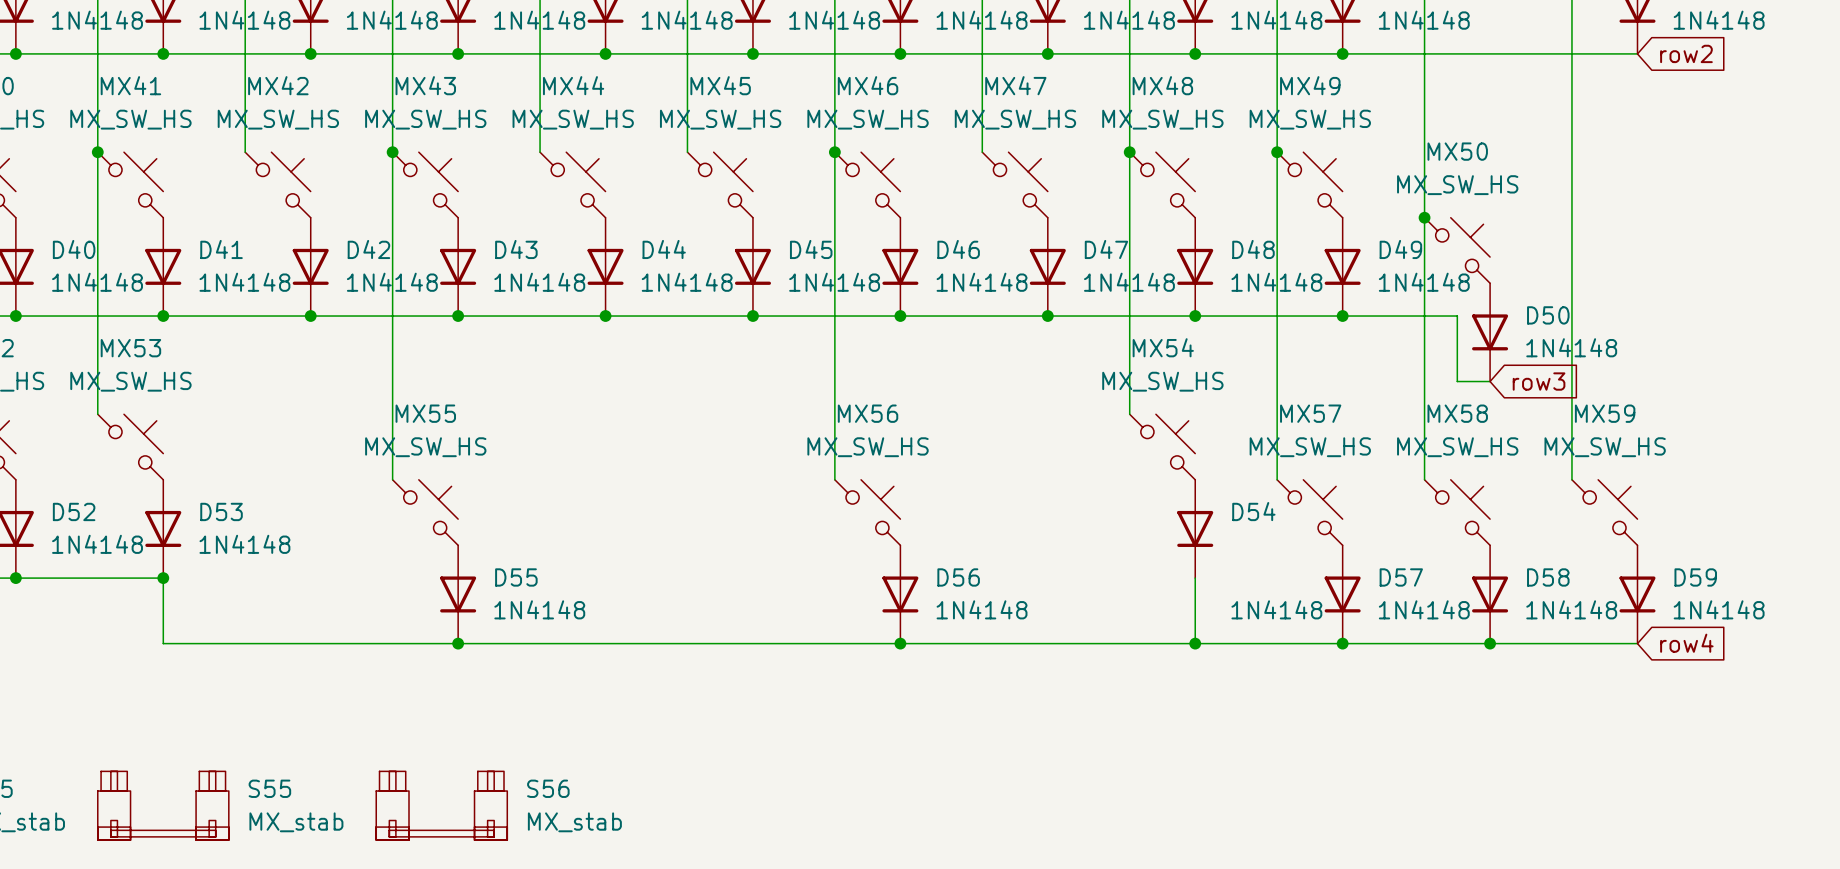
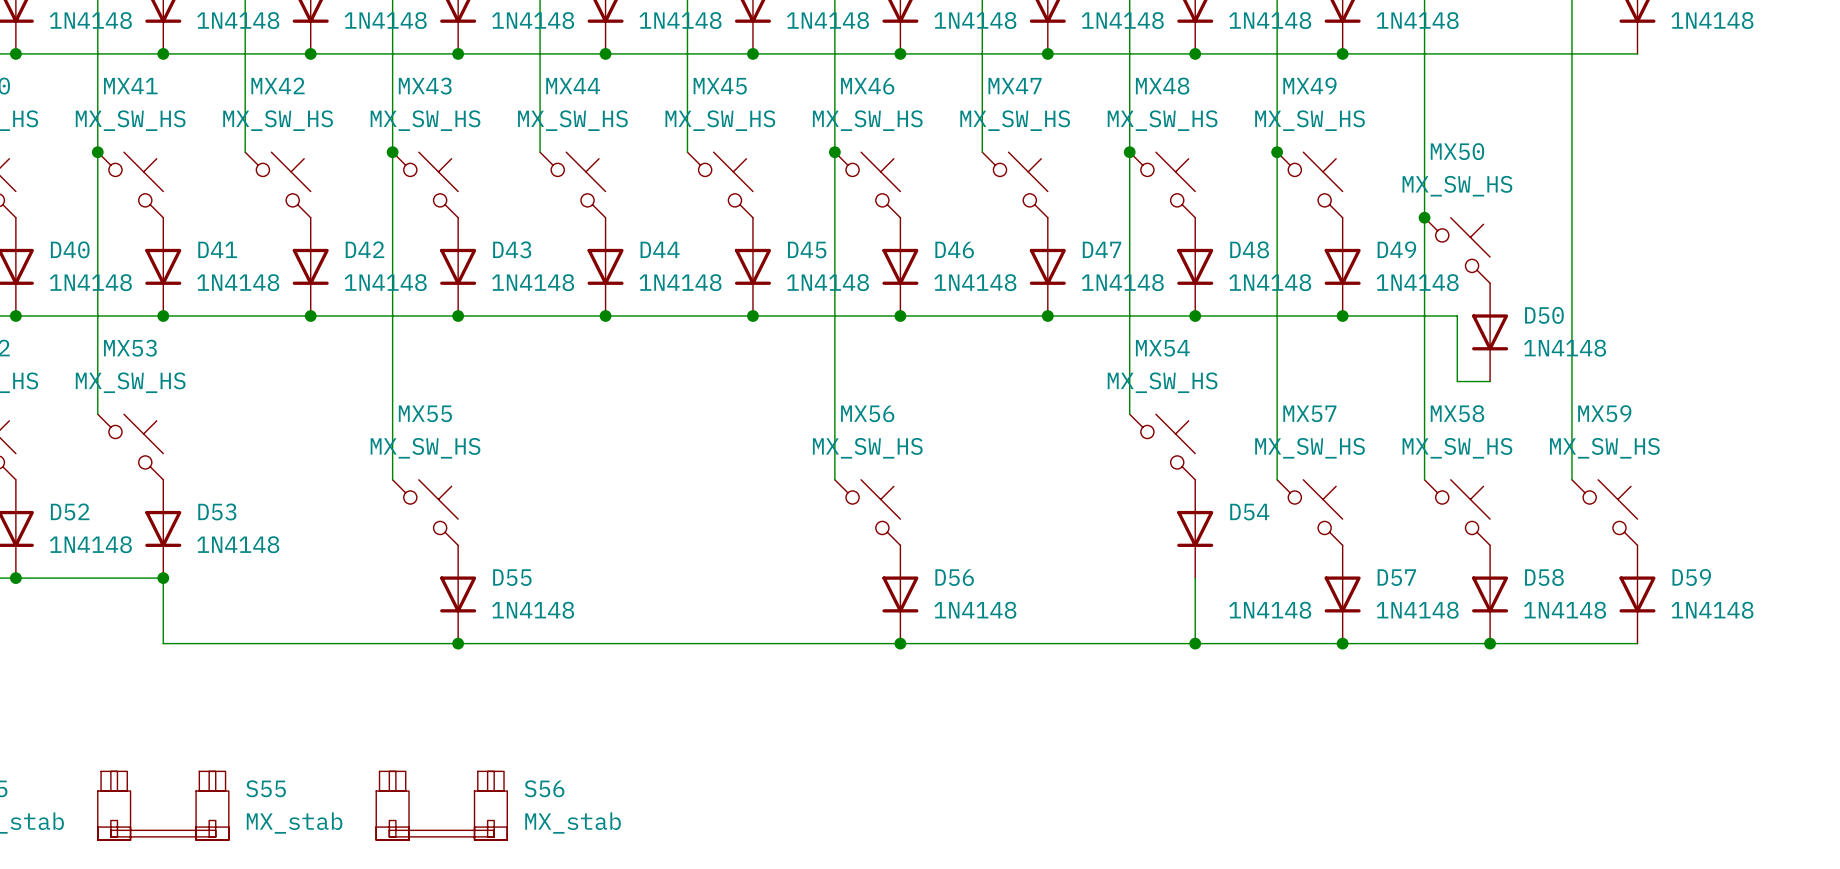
global label: row2 (1686, 53) -> none
global label: row3 (1539, 381) -> none
global label: row4 (1686, 643) -> none

